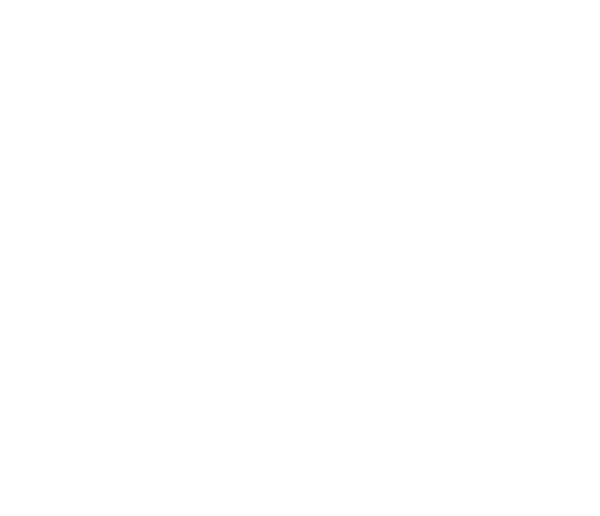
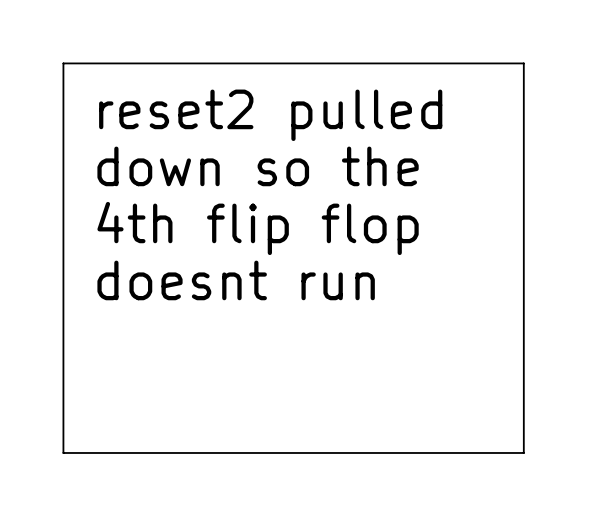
line: none -> (63, 63) (523, 63) (523, 452) (63, 452) (63, 63)
text: none -> reset2 pulled (270, 115)
text: none -> down so the (258, 166)
text: none -> 4th flip flop (258, 228)
text: none -> doesnt run (236, 280)

